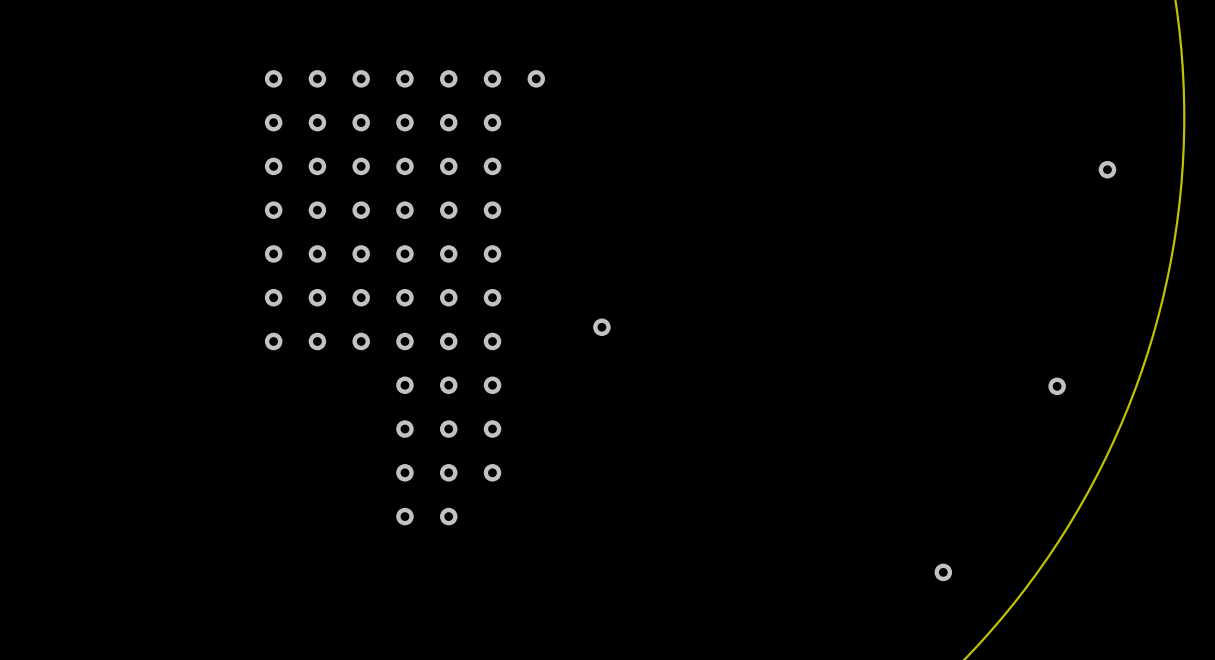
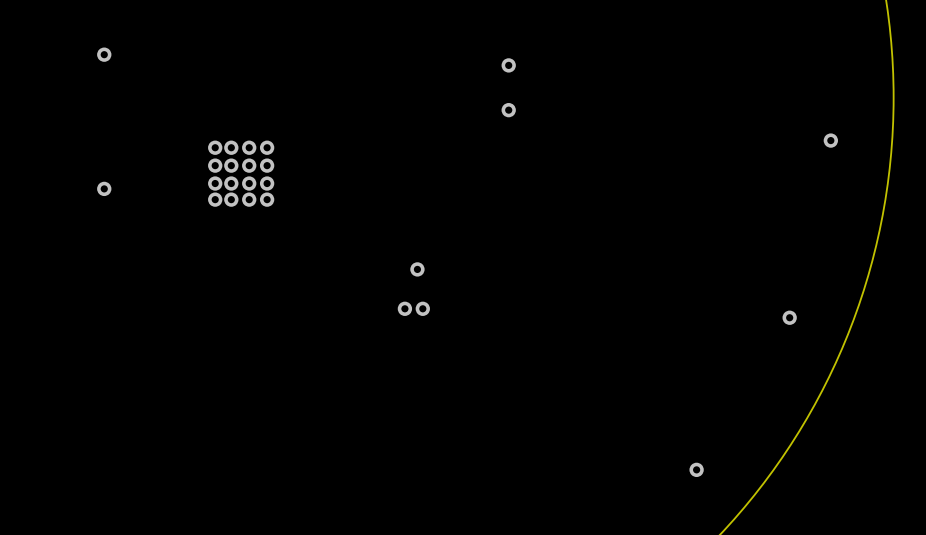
via: none -> (104, 54)
via: none -> (508, 65)
via: (273, 78) -> none
via: (317, 78) -> none
via: (361, 78) -> none
via: (404, 78) -> none
via: (448, 78) -> none
via: (492, 78) -> none
via: (536, 78) -> none
via: (273, 122) -> none
via: (317, 122) -> none
via: (361, 122) -> none
via: (404, 122) -> none
via: (448, 122) -> none
via: (492, 122) -> none
via: none -> (508, 110)
via: (273, 166) -> none
via: (317, 166) -> none
via: (361, 166) -> none
via: (404, 166) -> none
via: (448, 166) -> none
via: (492, 166) -> none
via: none -> (215, 147)
via: none -> (231, 147)
via: none -> (249, 147)
via: none -> (267, 147)
via: none -> (215, 165)
via: none -> (231, 165)
via: none -> (249, 165)
via: none -> (267, 165)
via: (273, 210) -> none
via: (317, 210) -> none
via: (361, 210) -> none
via: (404, 210) -> none
via: (448, 210) -> none
via: (492, 210) -> none
via: none -> (215, 183)
via: none -> (231, 183)
via: none -> (249, 183)
via: none -> (267, 183)
via: none -> (104, 188)
via: none -> (215, 199)
via: none -> (231, 199)
via: none -> (249, 199)
via: none -> (267, 199)
via: (273, 253) -> none
via: (317, 253) -> none
via: (361, 253) -> none
via: (404, 253) -> none
via: (448, 253) -> none
via: (492, 253) -> none
via: (273, 297) -> none
via: (317, 297) -> none
via: (361, 297) -> none
via: (404, 297) -> none
via: (448, 297) -> none
via: (492, 297) -> none
via: (273, 341) -> none
via: (317, 341) -> none
via: (361, 341) -> none
via: (404, 341) -> none
via: (448, 341) -> none
via: (492, 341) -> none
via: none -> (404, 308)
via: none -> (422, 308)
via: (404, 385) -> none
via: (448, 385) -> none
via: (492, 385) -> none
via: (404, 429) -> none
via: (448, 429) -> none
via: (492, 429) -> none
via: (404, 472) -> none
via: (448, 472) -> none
via: (492, 472) -> none
via: (404, 516) -> none
via: (448, 516) -> none

